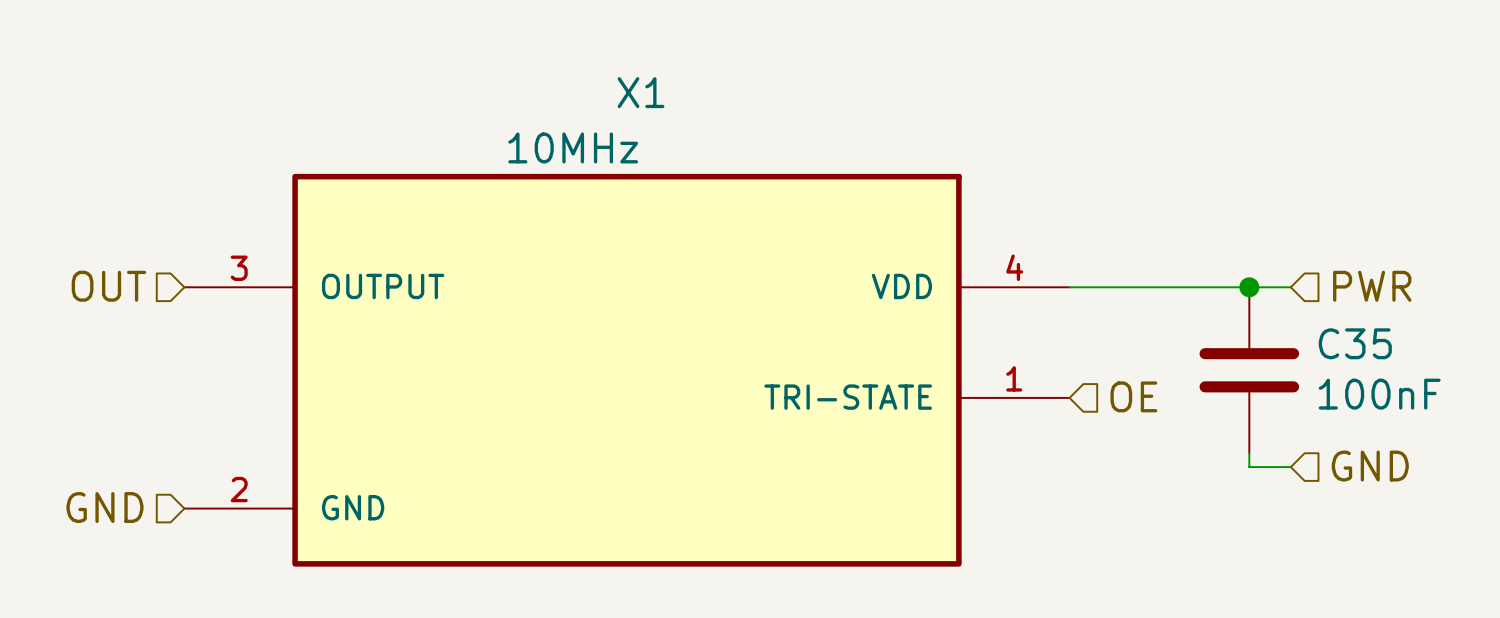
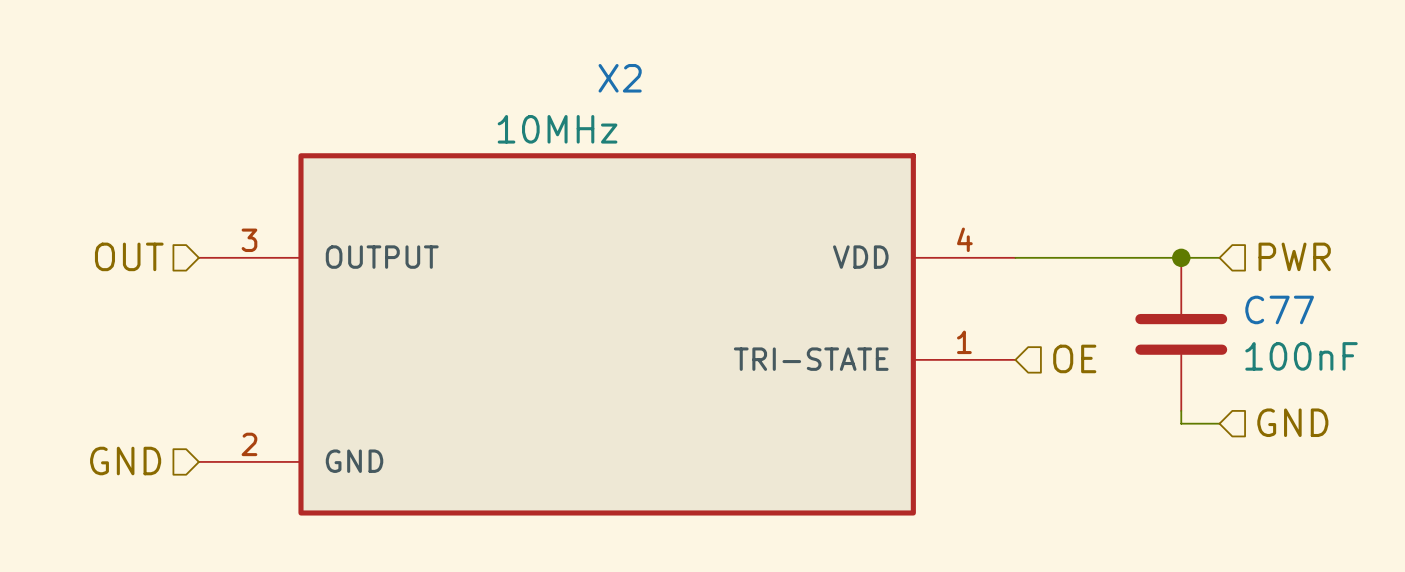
X1 name: X1 (641, 92) -> X2 (620, 78)
C35 name: C35 (1355, 343) -> C77 (1279, 309)

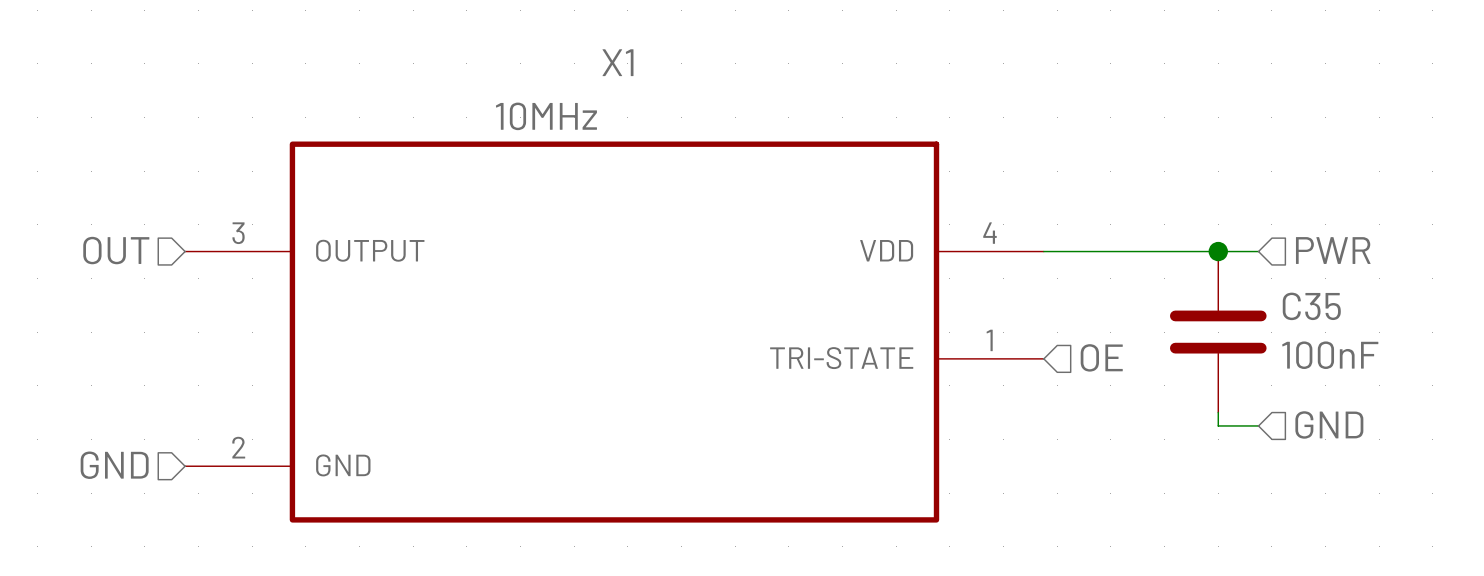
X2 name: X2 (620, 78) -> X1 (617, 62)
C77 name: C77 (1279, 309) -> C35 (1311, 306)

